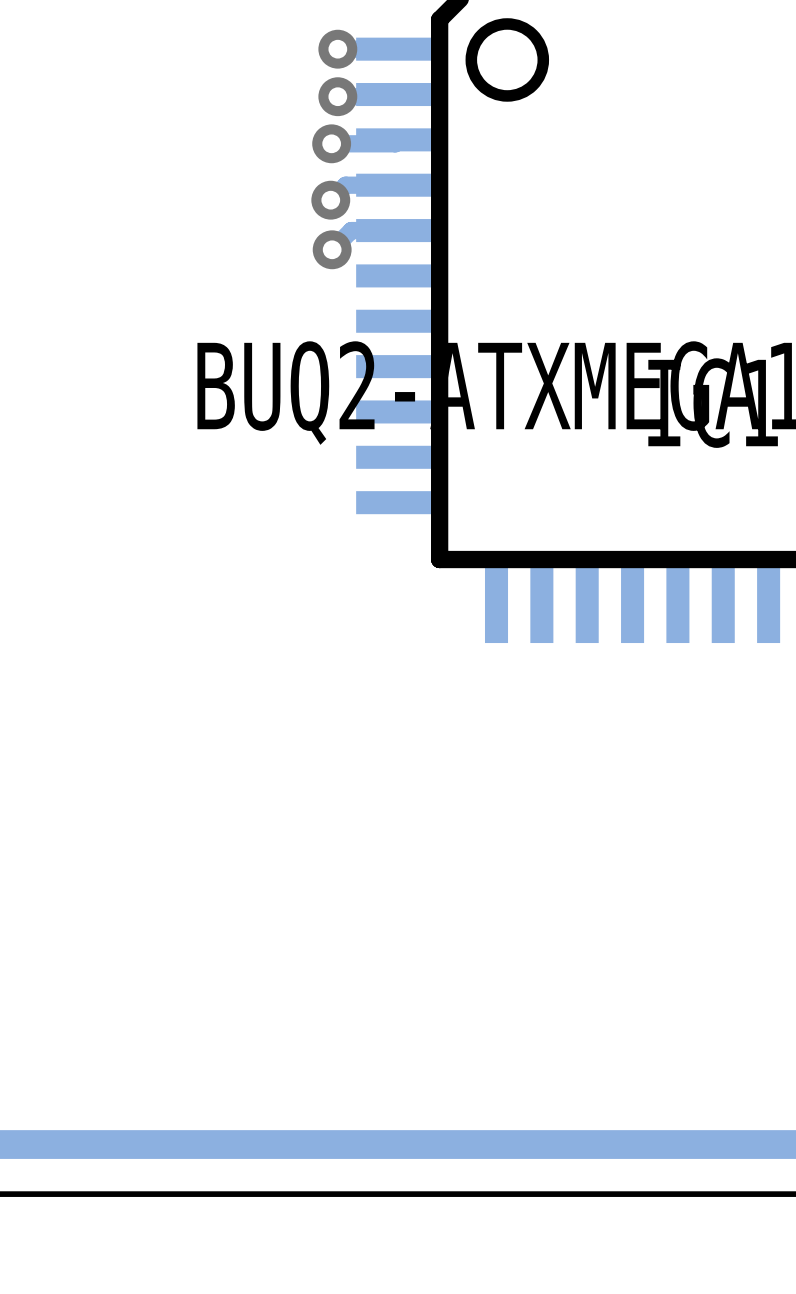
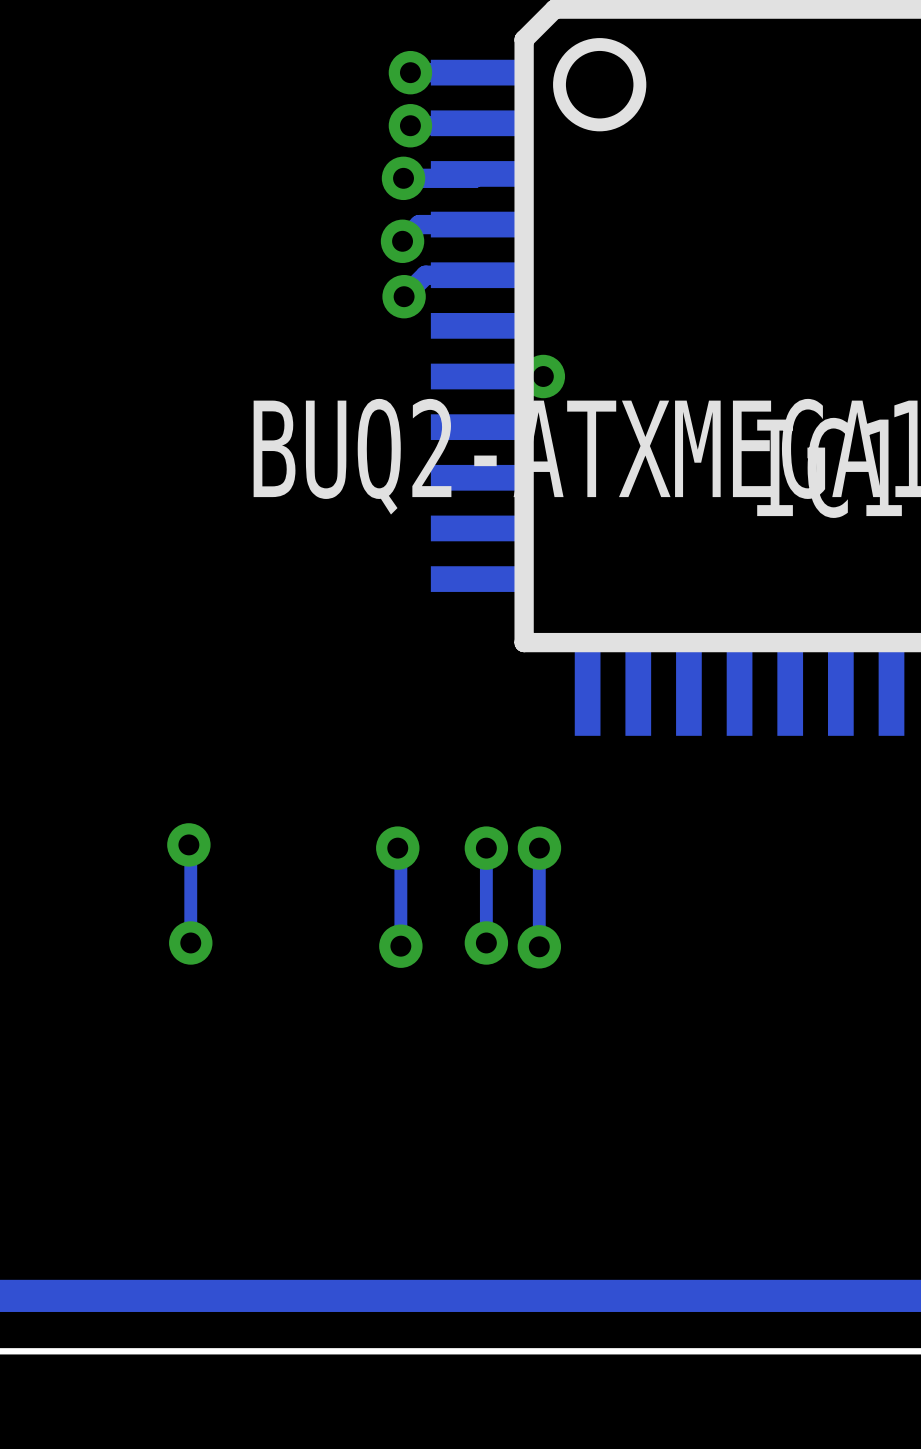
via: none -> (543, 376)
track: none -> (188, 844) (190, 846) (190, 942)
via: none -> (188, 844)
track: none -> (397, 848) (400, 851) (400, 946)
via: none -> (397, 848)
track: none -> (486, 848) (486, 942)
via: none -> (486, 848)
track: none -> (539, 848) (539, 946)
via: none -> (539, 848)
via: none -> (190, 942)
via: none -> (486, 942)
via: none -> (400, 946)
via: none -> (539, 946)

